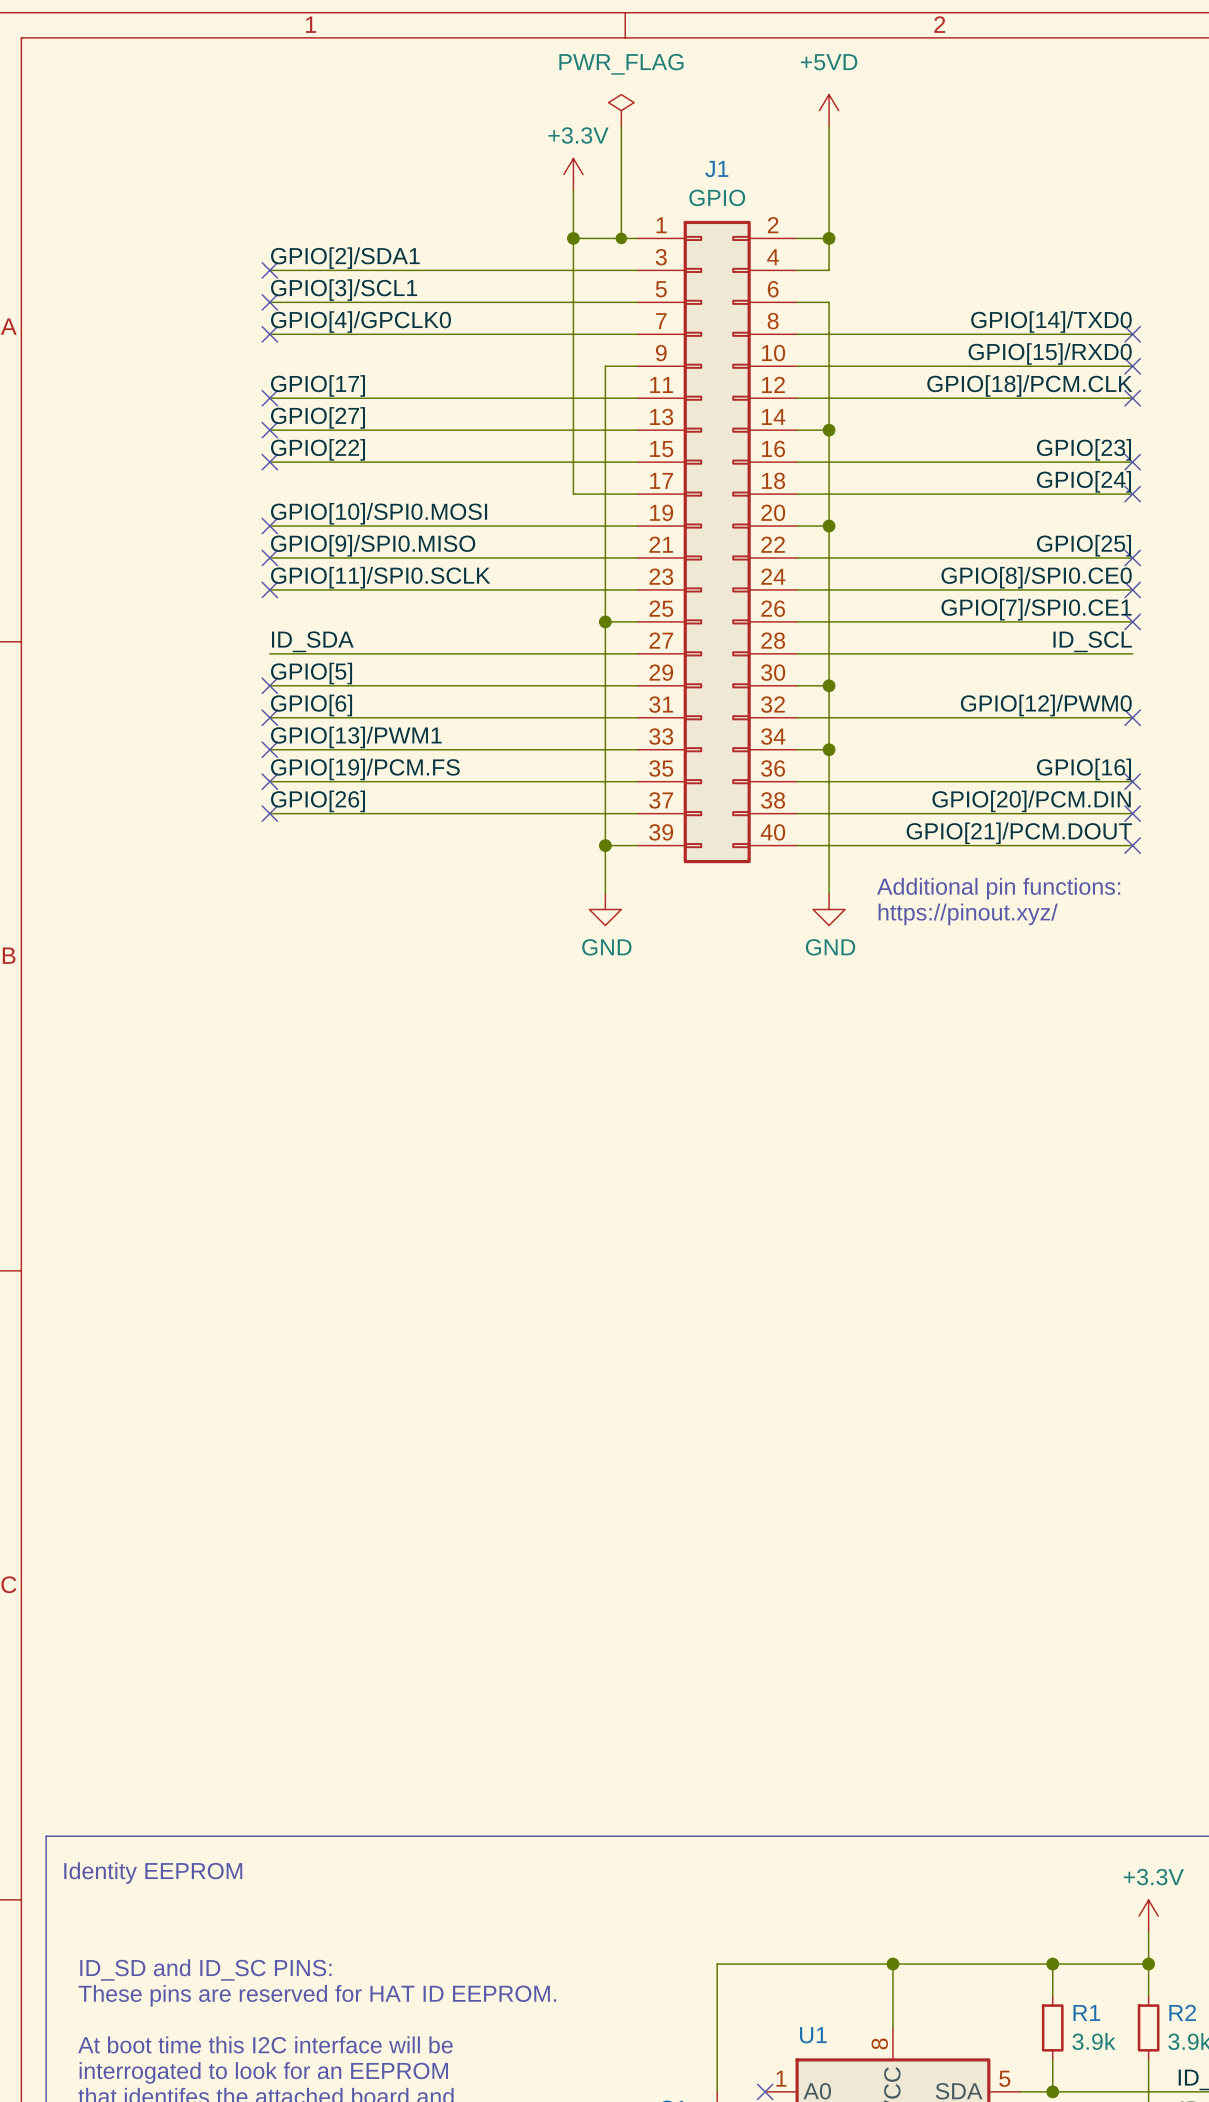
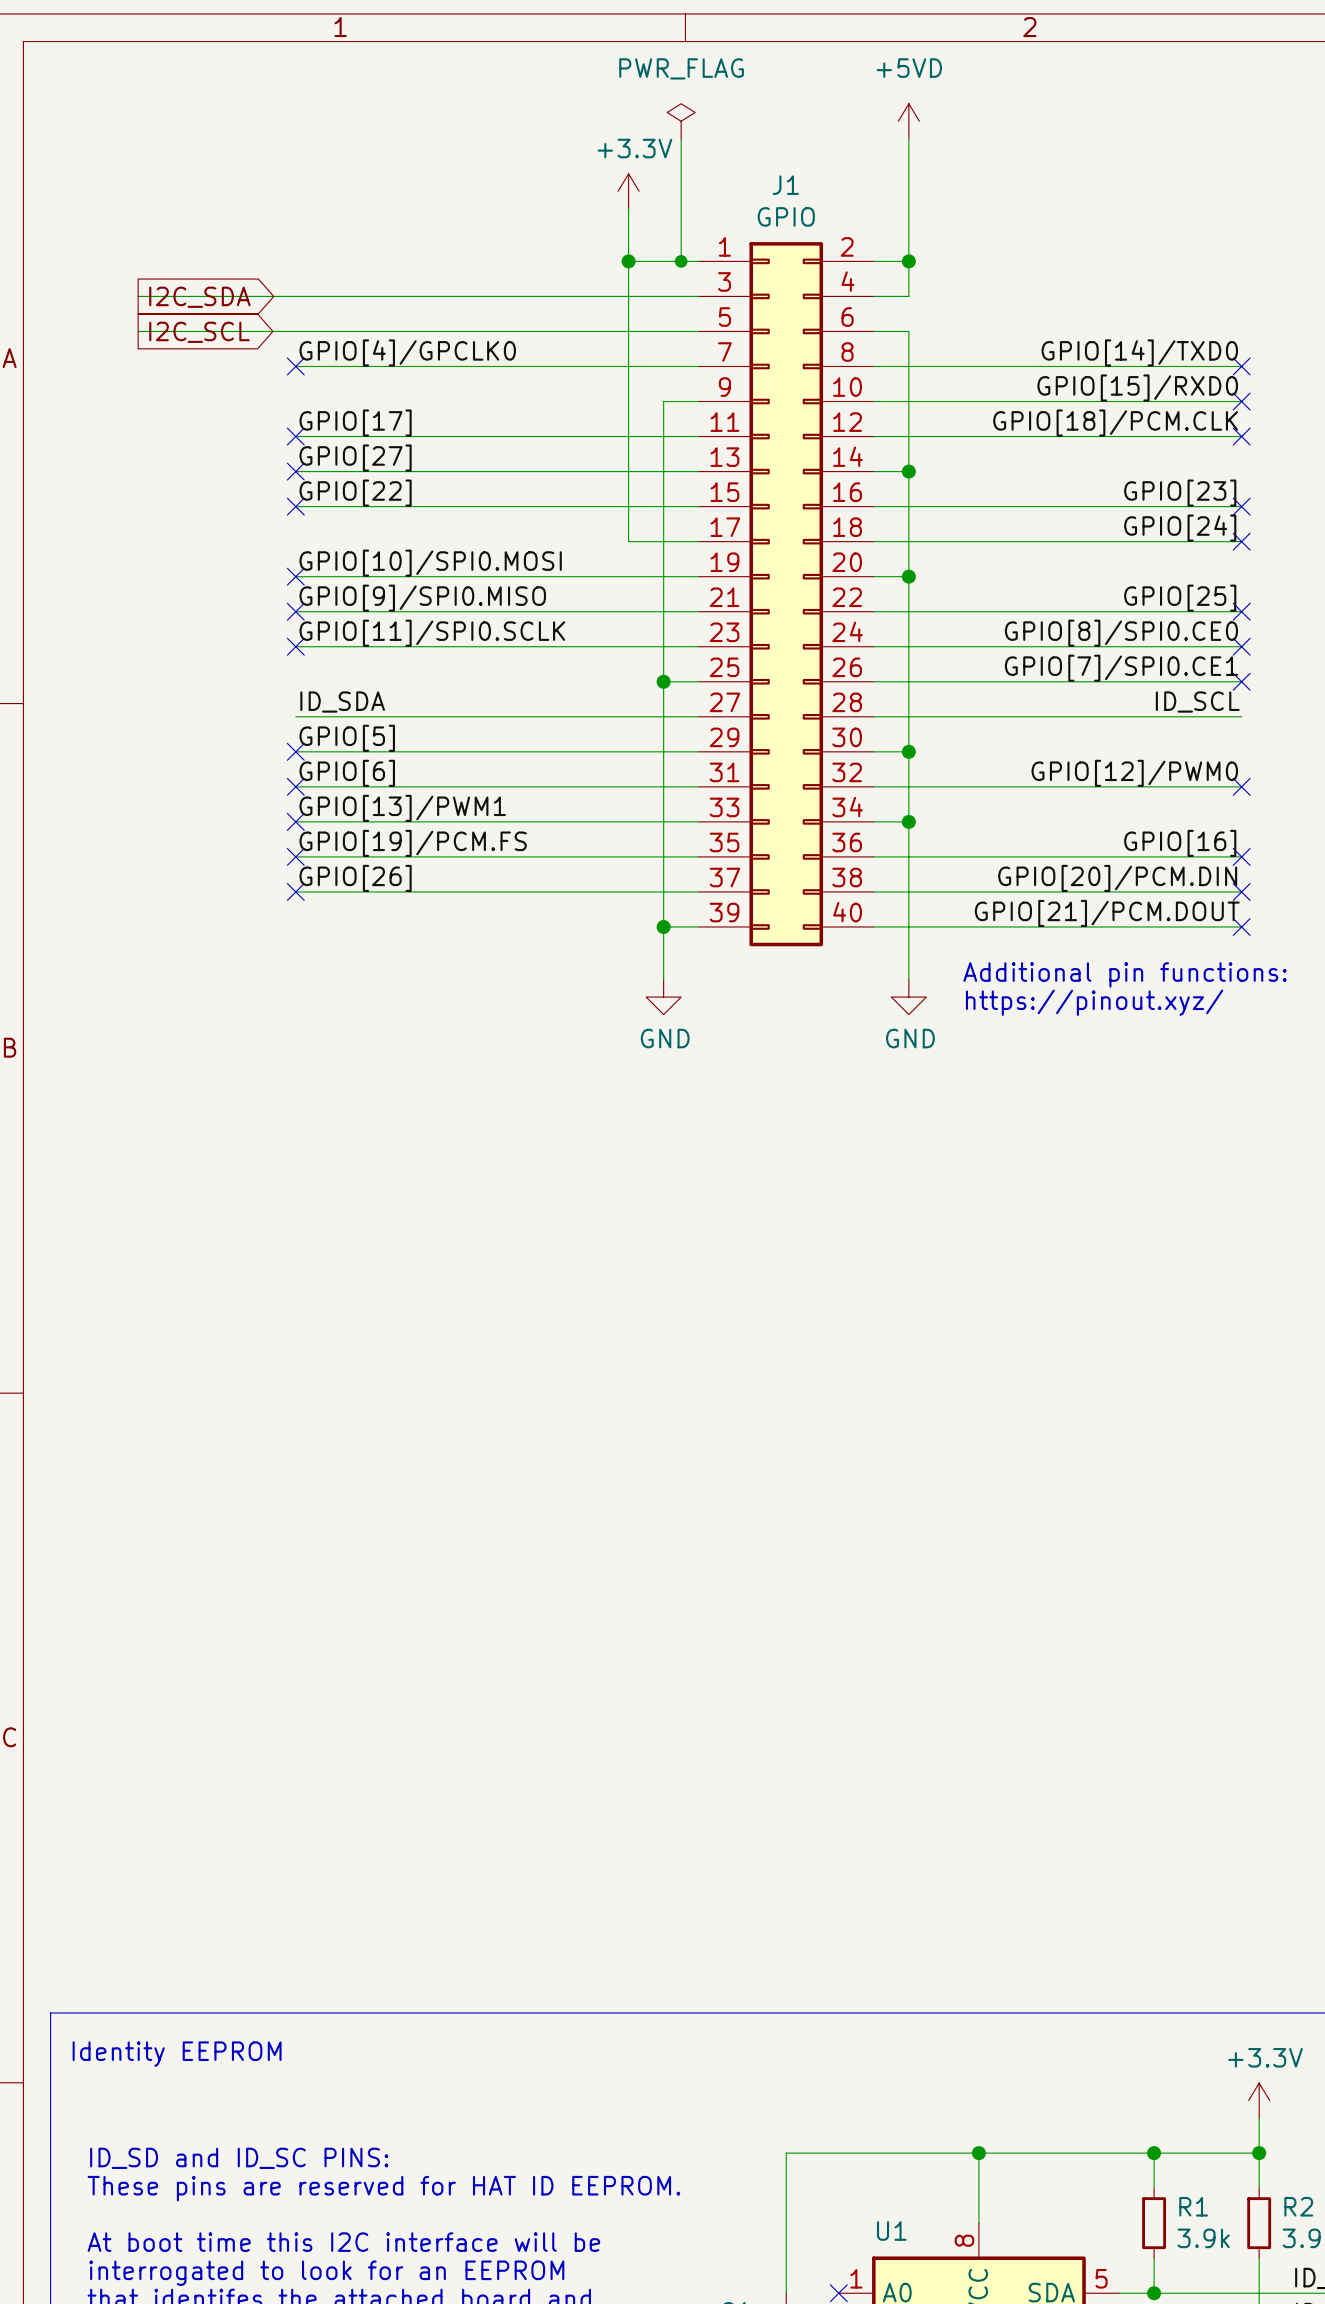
label: GPIO[2]/SDA1 (345, 258) -> none
wire: none -> (138, 296) (295, 296)
no-connect mark: (269, 270) -> none
global label: none -> I2C_SDA (199, 297)
label: GPIO[3]/SCL1 (344, 290) -> none
wire: none -> (138, 331) (295, 331)
no-connect mark: (269, 302) -> none
global label: none -> I2C_SCL (199, 332)

